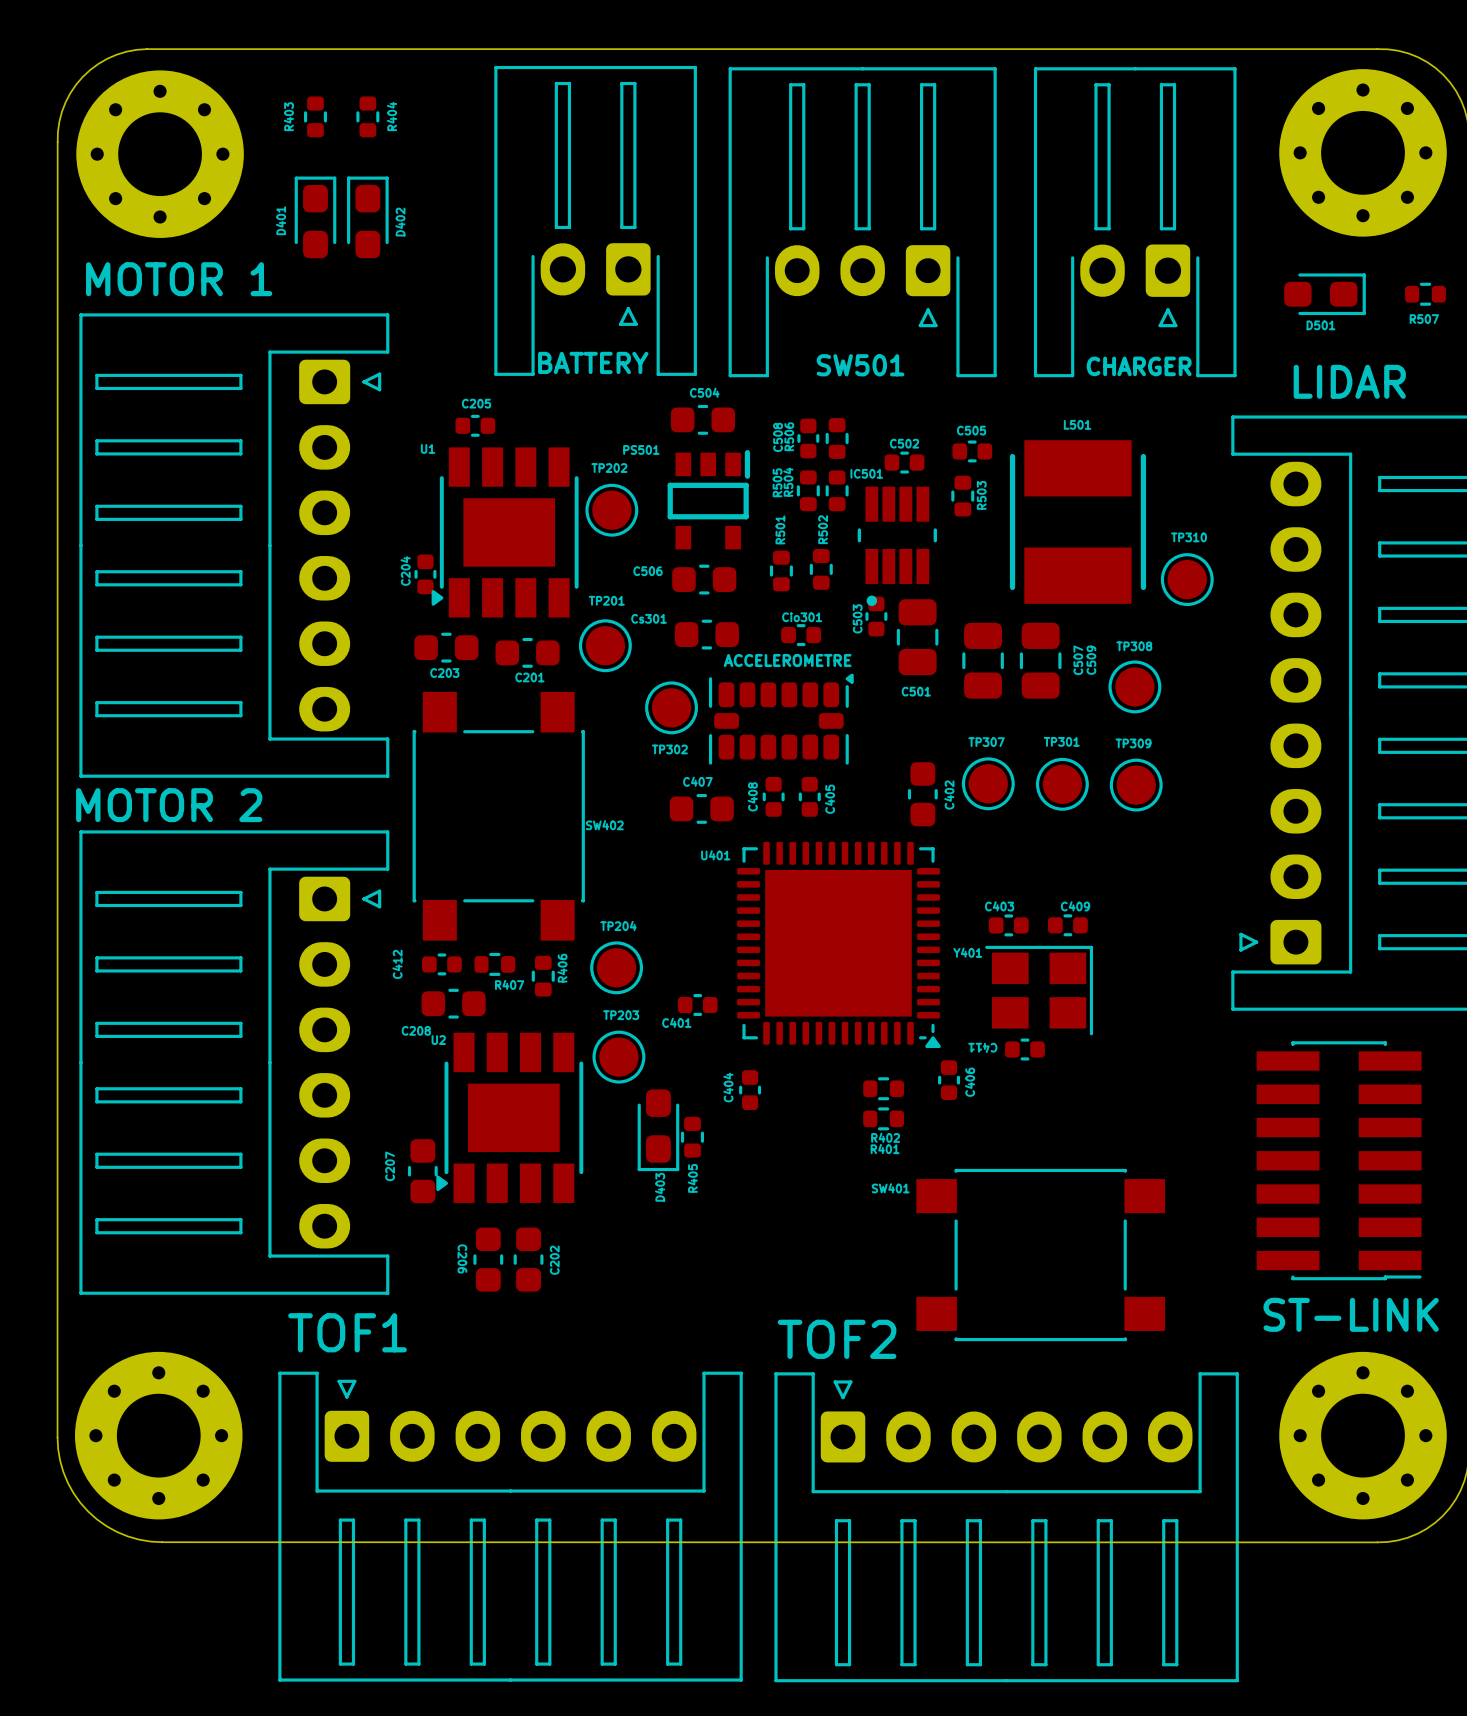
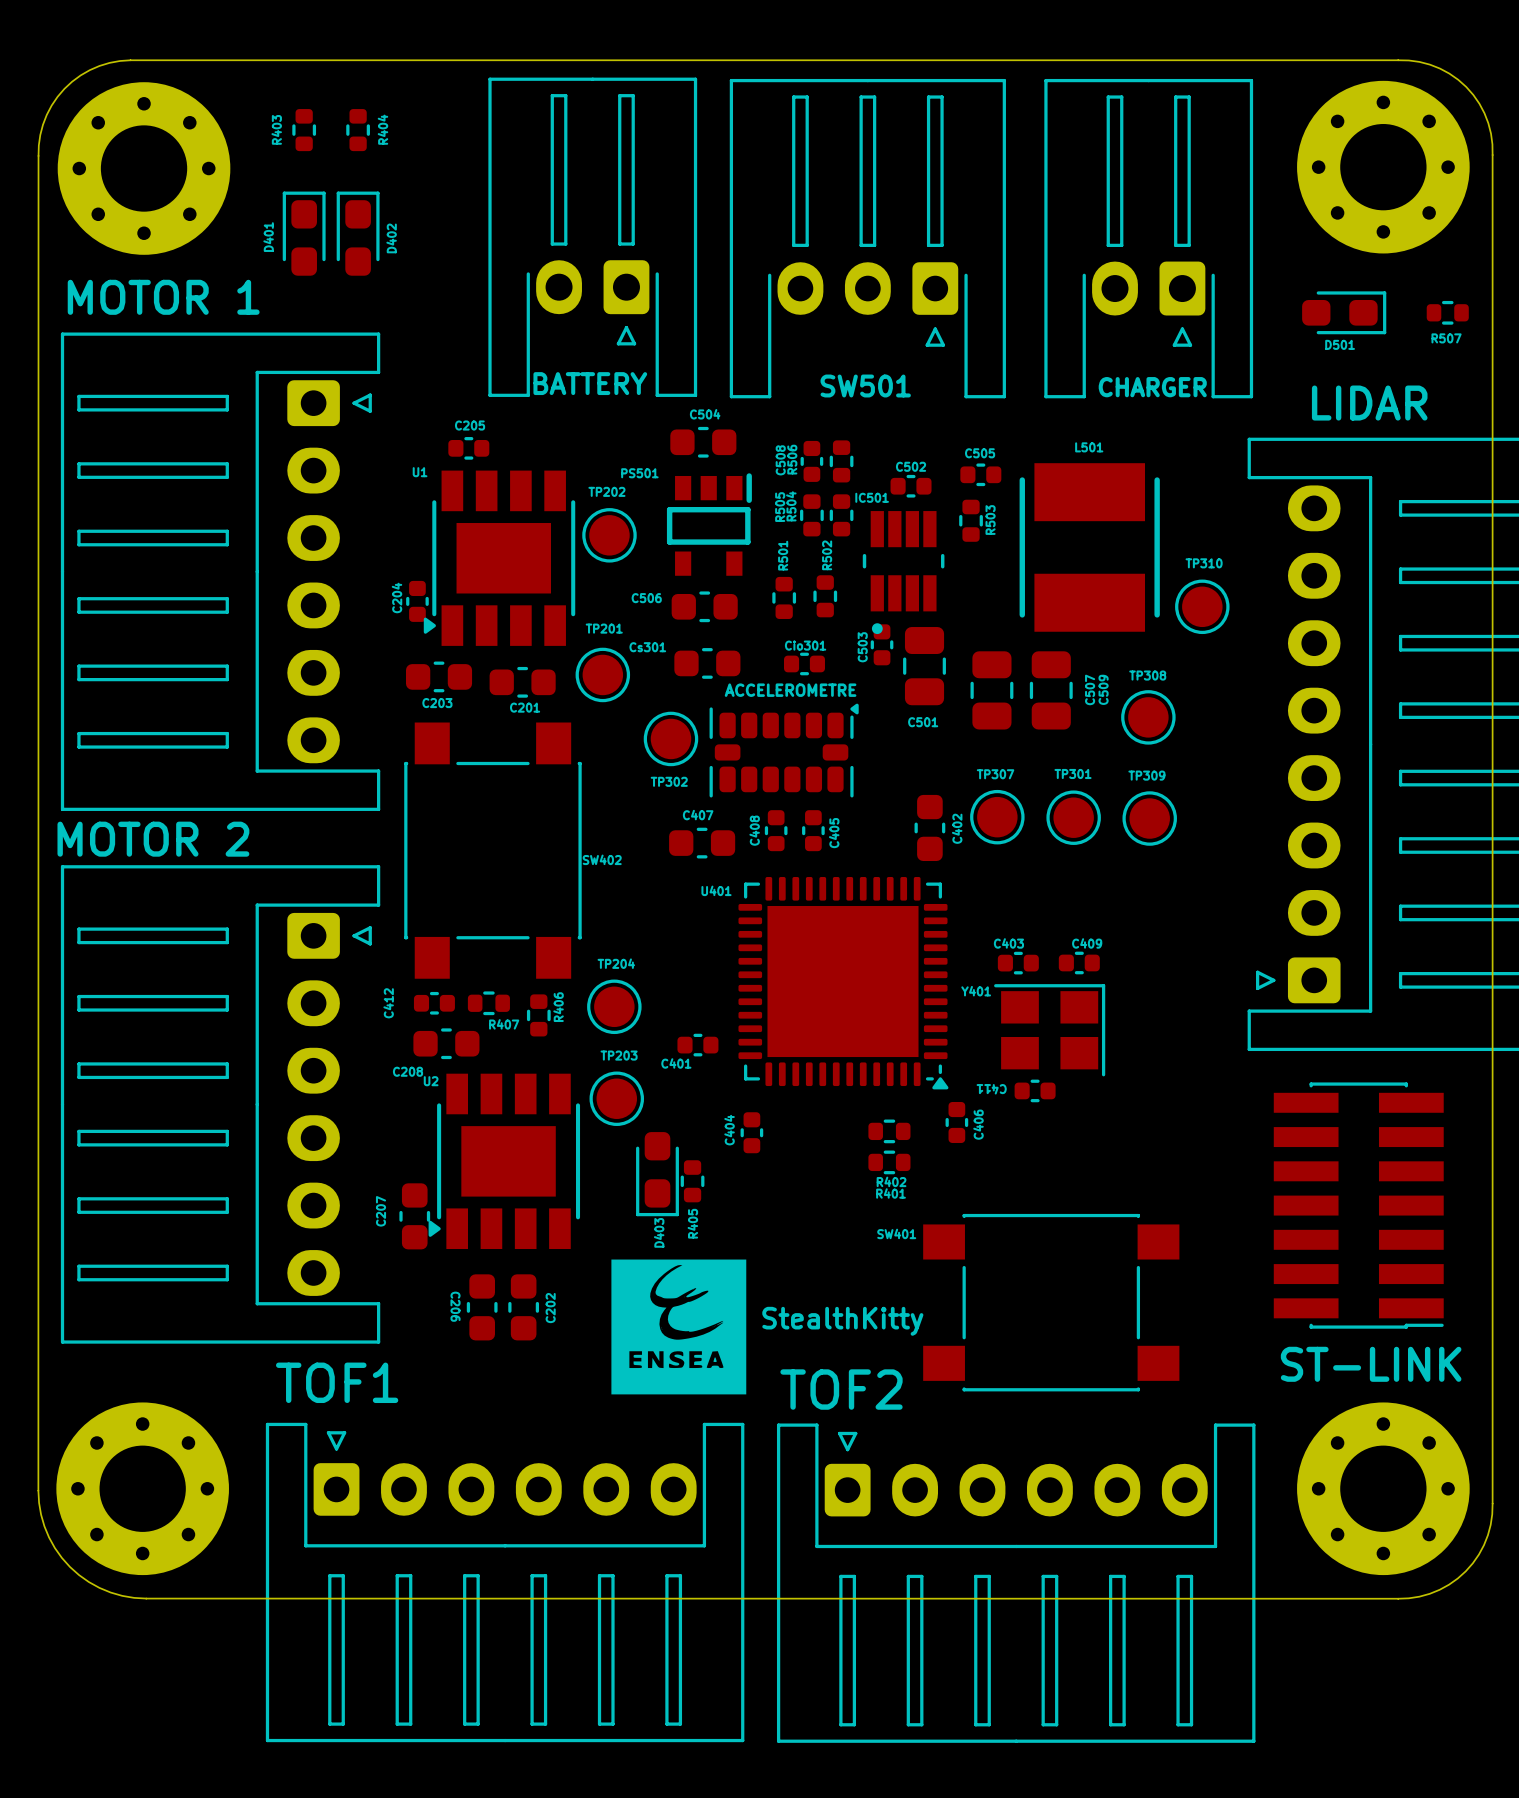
drawing: none -> [611, 1259, 747, 1395]
text: none -> StealthKitty (842, 1321)

